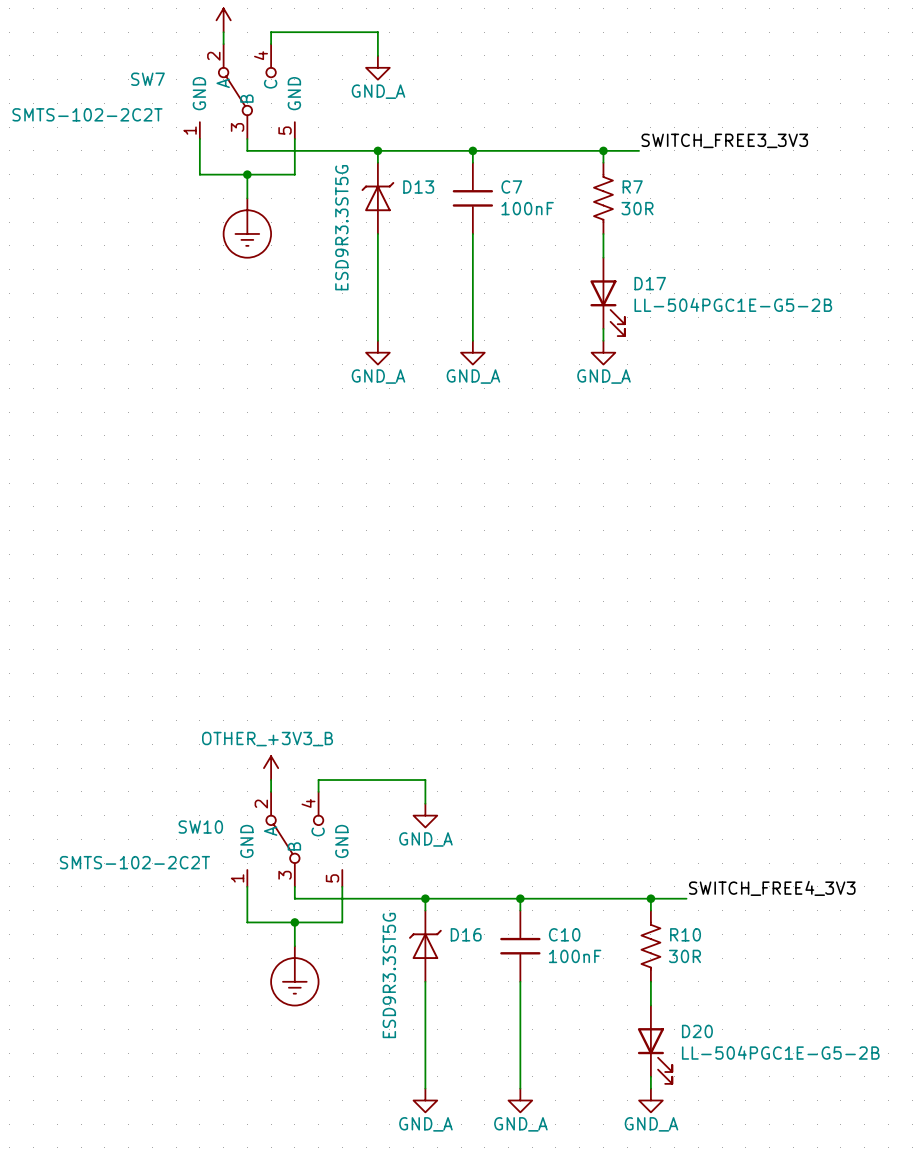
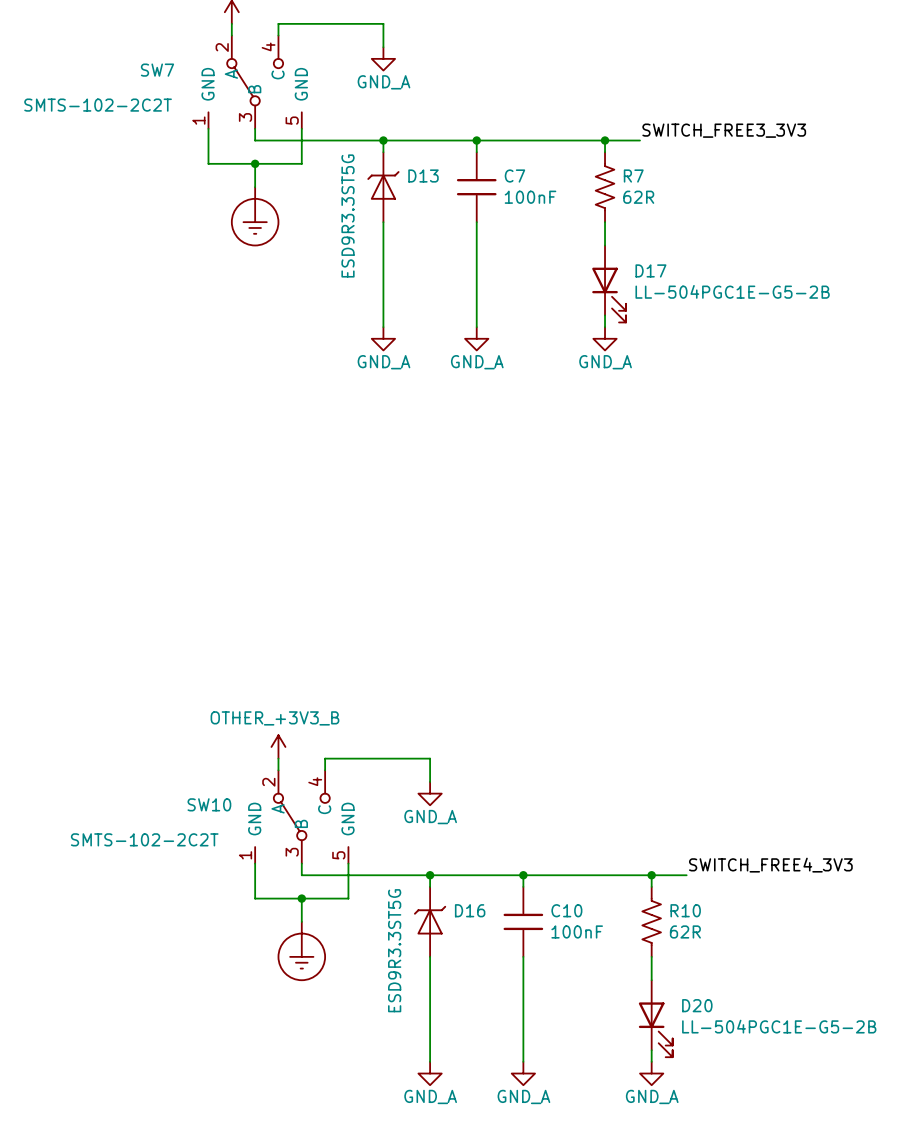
R7 value: 30R (637, 208) -> 62R (638, 197)
R10 value: 30R (684, 956) -> 62R (685, 931)

